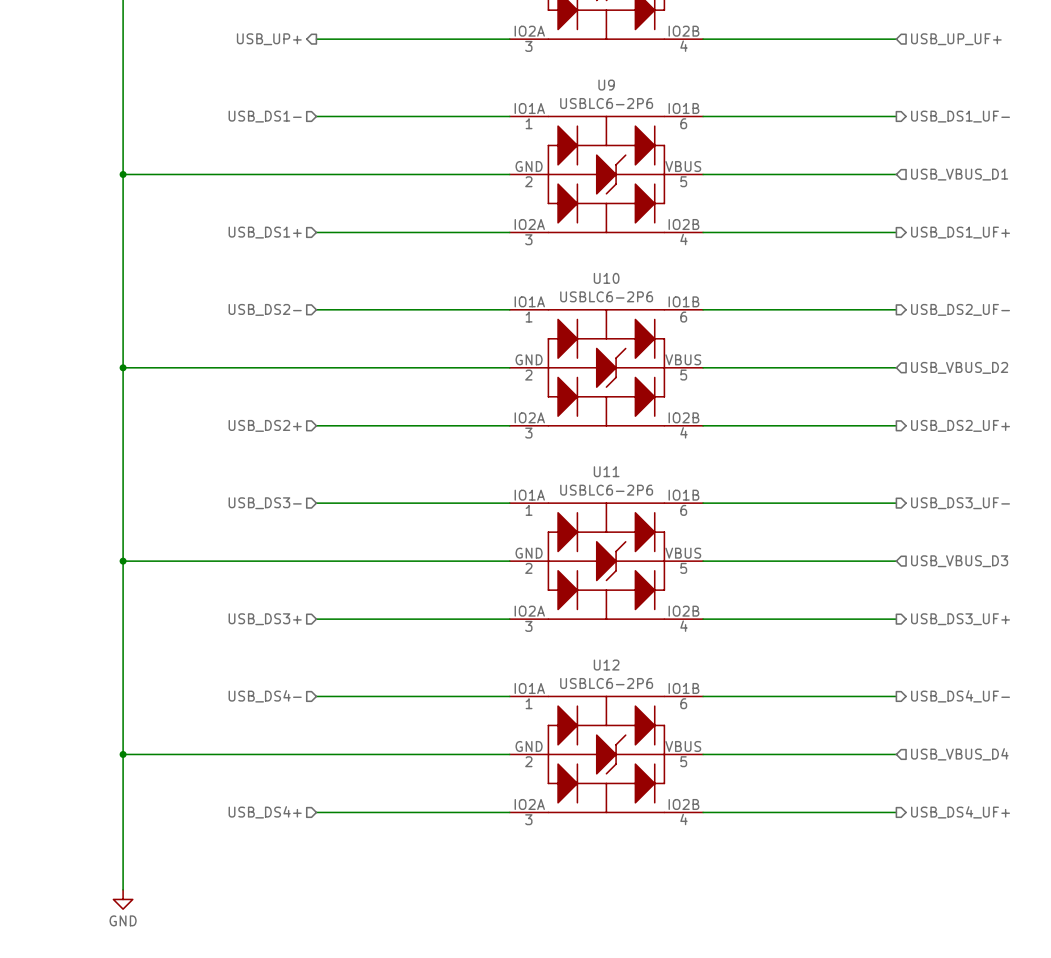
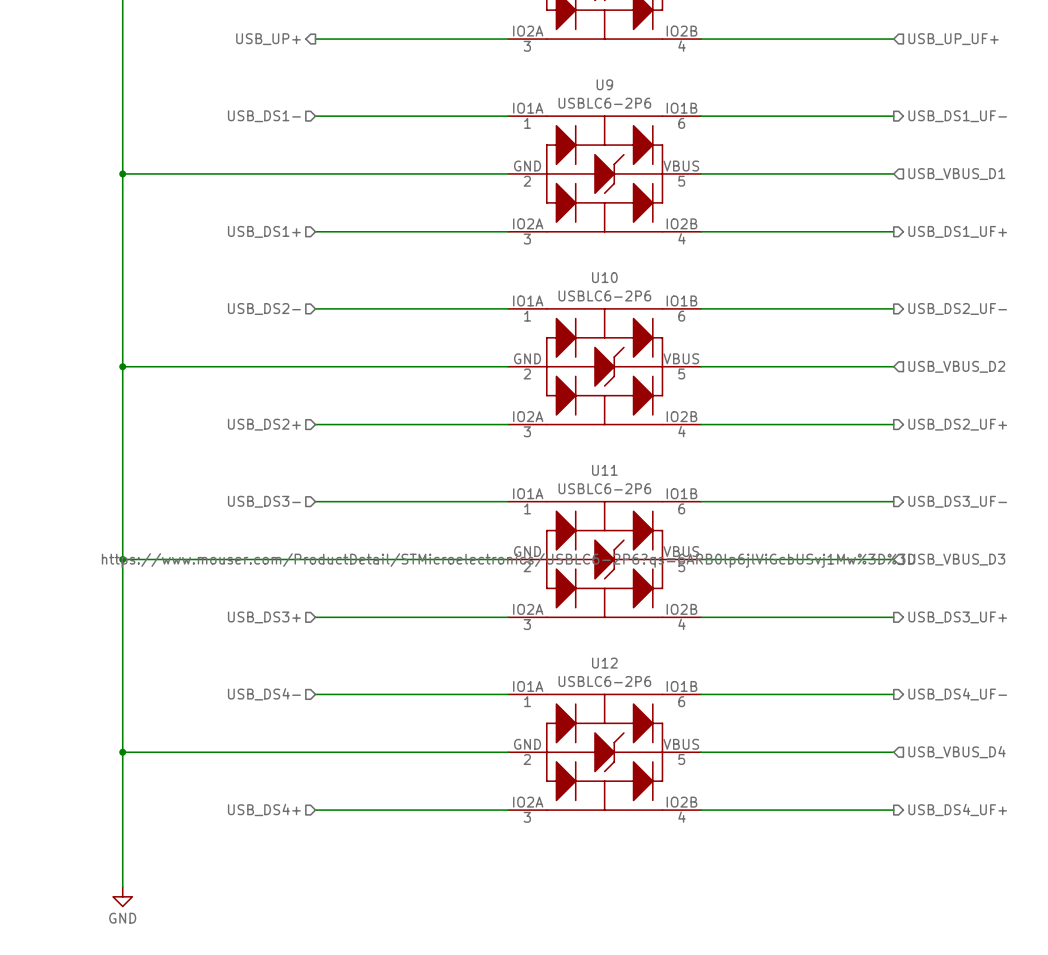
U11 text: none -> https://www.mouser.com/ProductDetail/STMicroelectronics/USBLC6-2P6?qs=6ARB0lp6jlViGcbUSvj1Mw%3D%3D (508, 560)

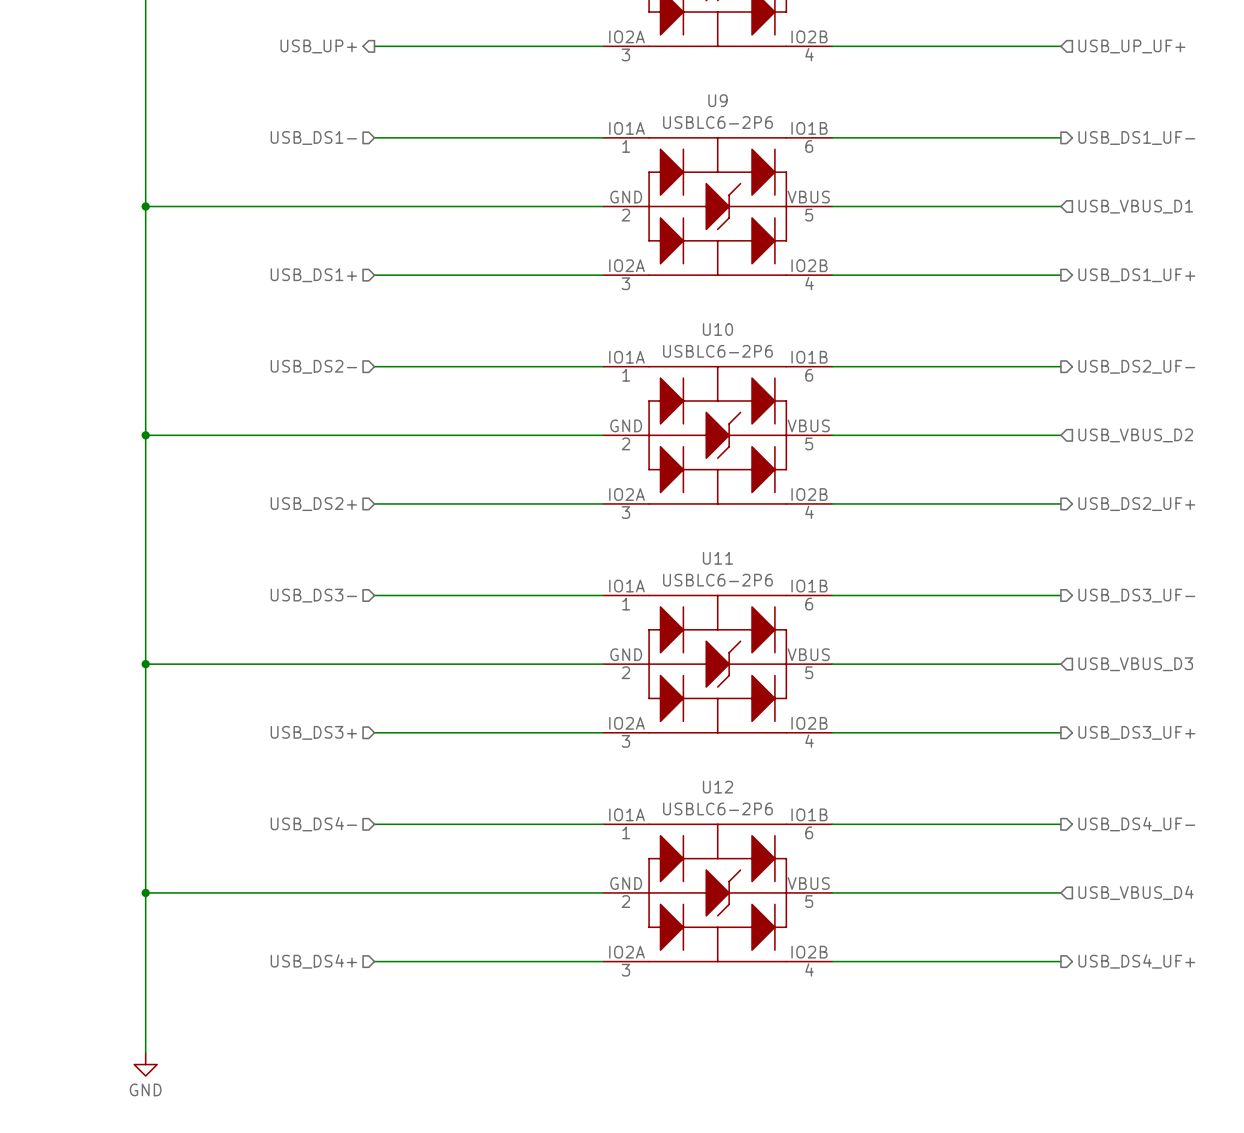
U11 text: https://www.mouser.com/ProductDetail/STMicroelectronics/USBLC6-2P6?qs=6ARB0lp6jlViGcbUSvj1Mw%3D%3D (508, 560) -> none

